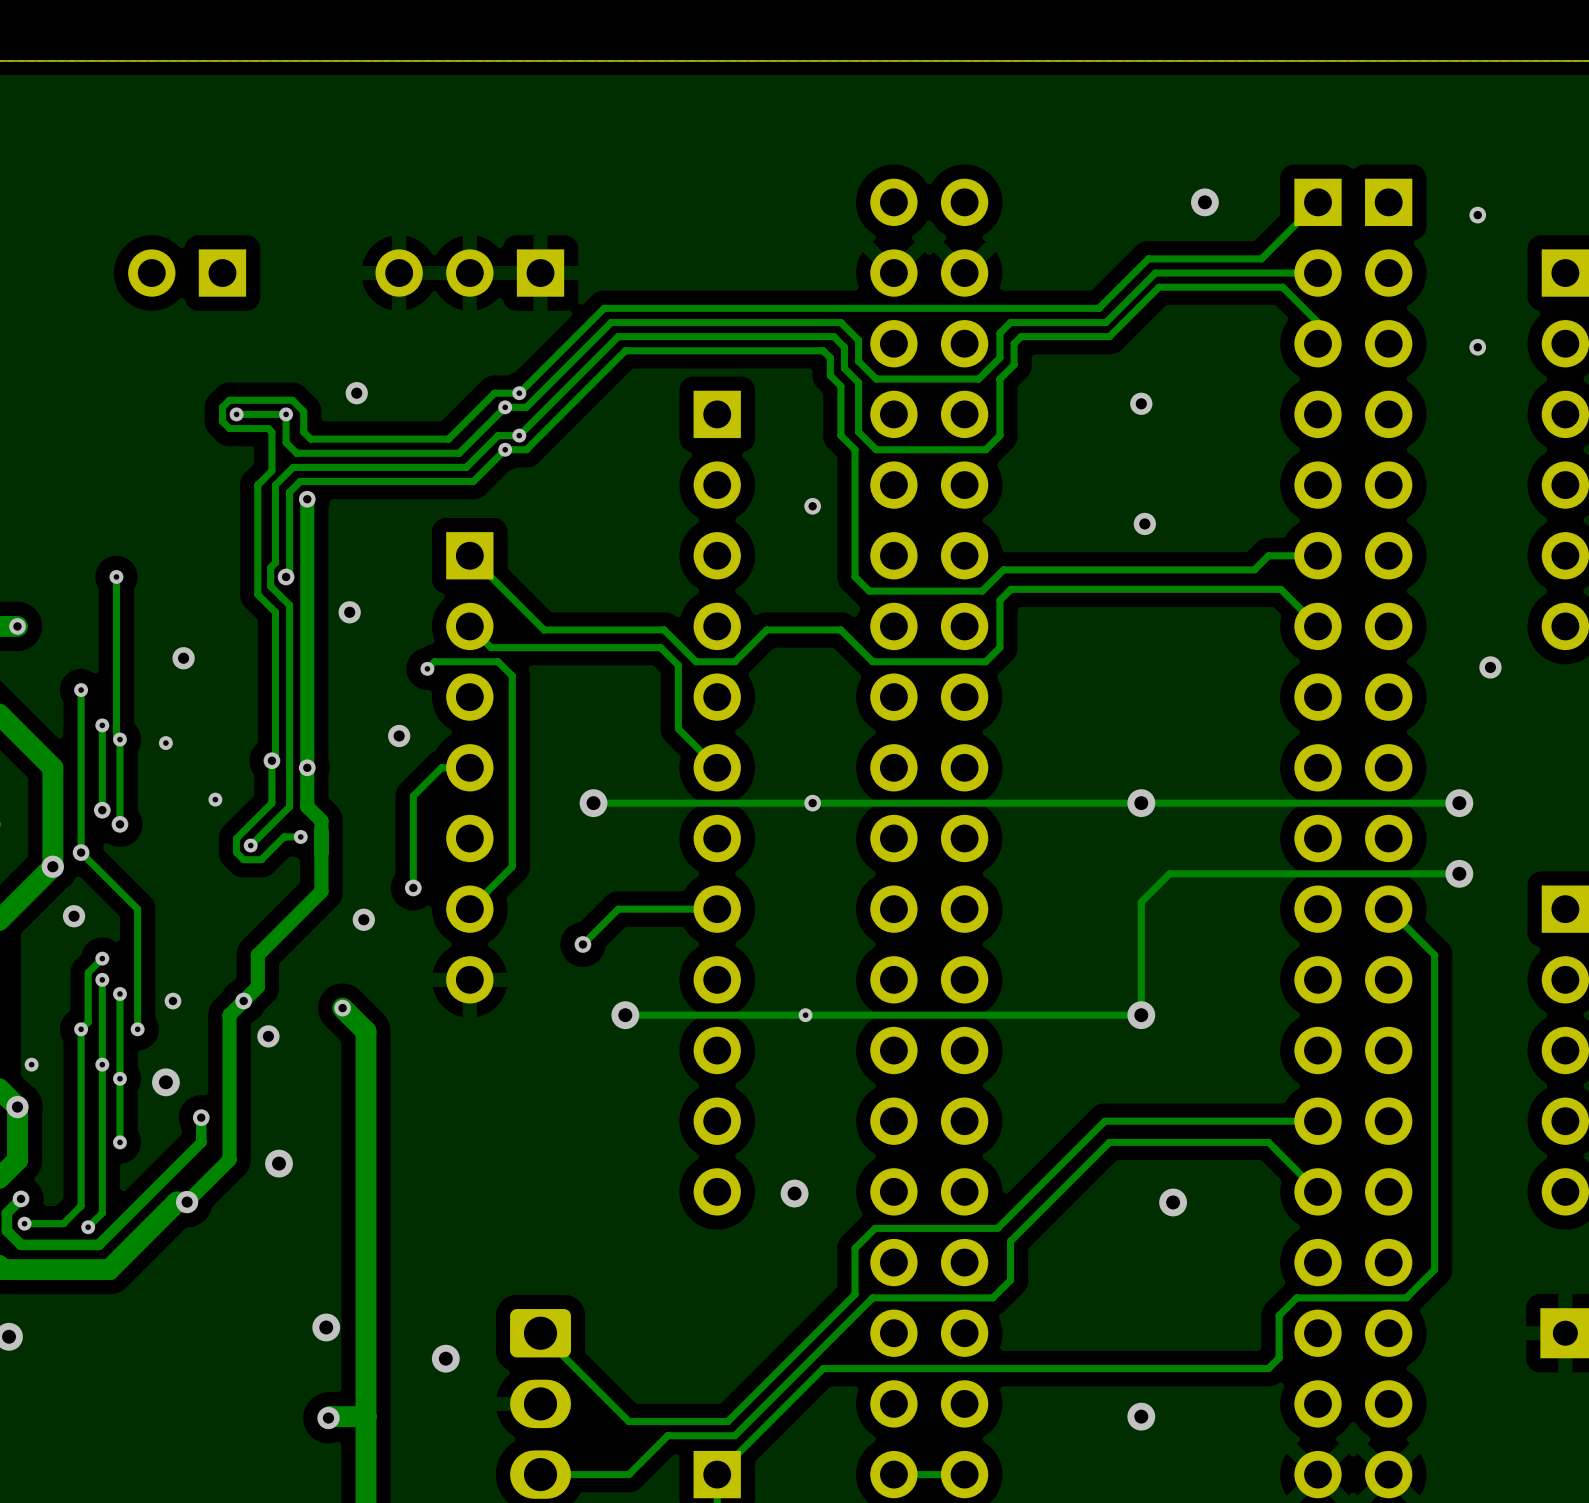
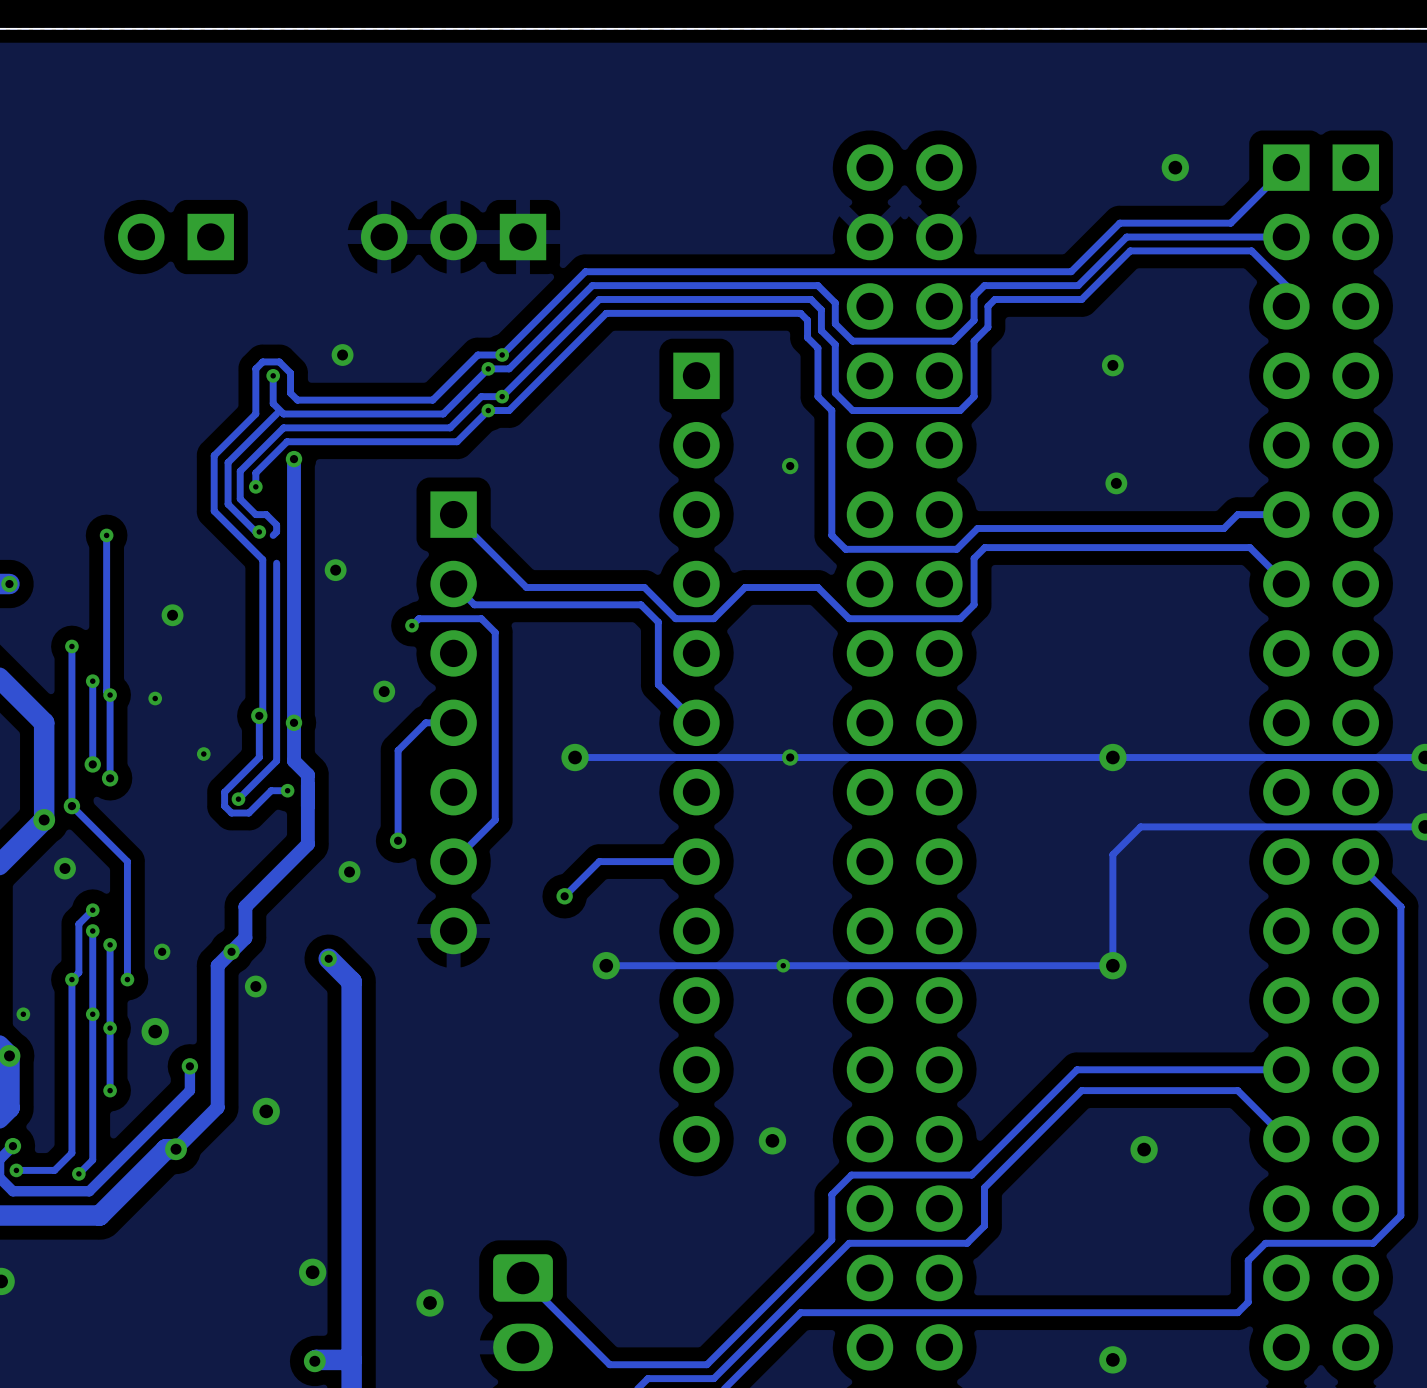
track: (275, 400) (229, 400) (222, 407) (222, 421) (229, 428) (268, 428) (271, 432) (271, 470) -> (276, 413) (259, 431)
track: none -> (262, 361) (255, 368) (255, 413) (214, 455) (214, 511) (262, 559) (262, 570)
via: (236, 414) -> none
track: (286, 414) (236, 414) -> none
track: (296, 467) (293, 467) (275, 485) (275, 562) (270, 567) (270, 586) (289, 605) -> none
track: (257, 485) (257, 594) (275, 612) -> (245, 445) (228, 462) (228, 504) (255, 531) (259, 531)
track: (289, 492) (289, 566) -> (283, 427) (240, 471) (240, 499) (255, 514) (266, 514) (276, 525)
track: none -> (276, 452) (255, 472) (255, 486)
via: none -> (255, 486)
via position: (286, 576) -> (259, 531)

